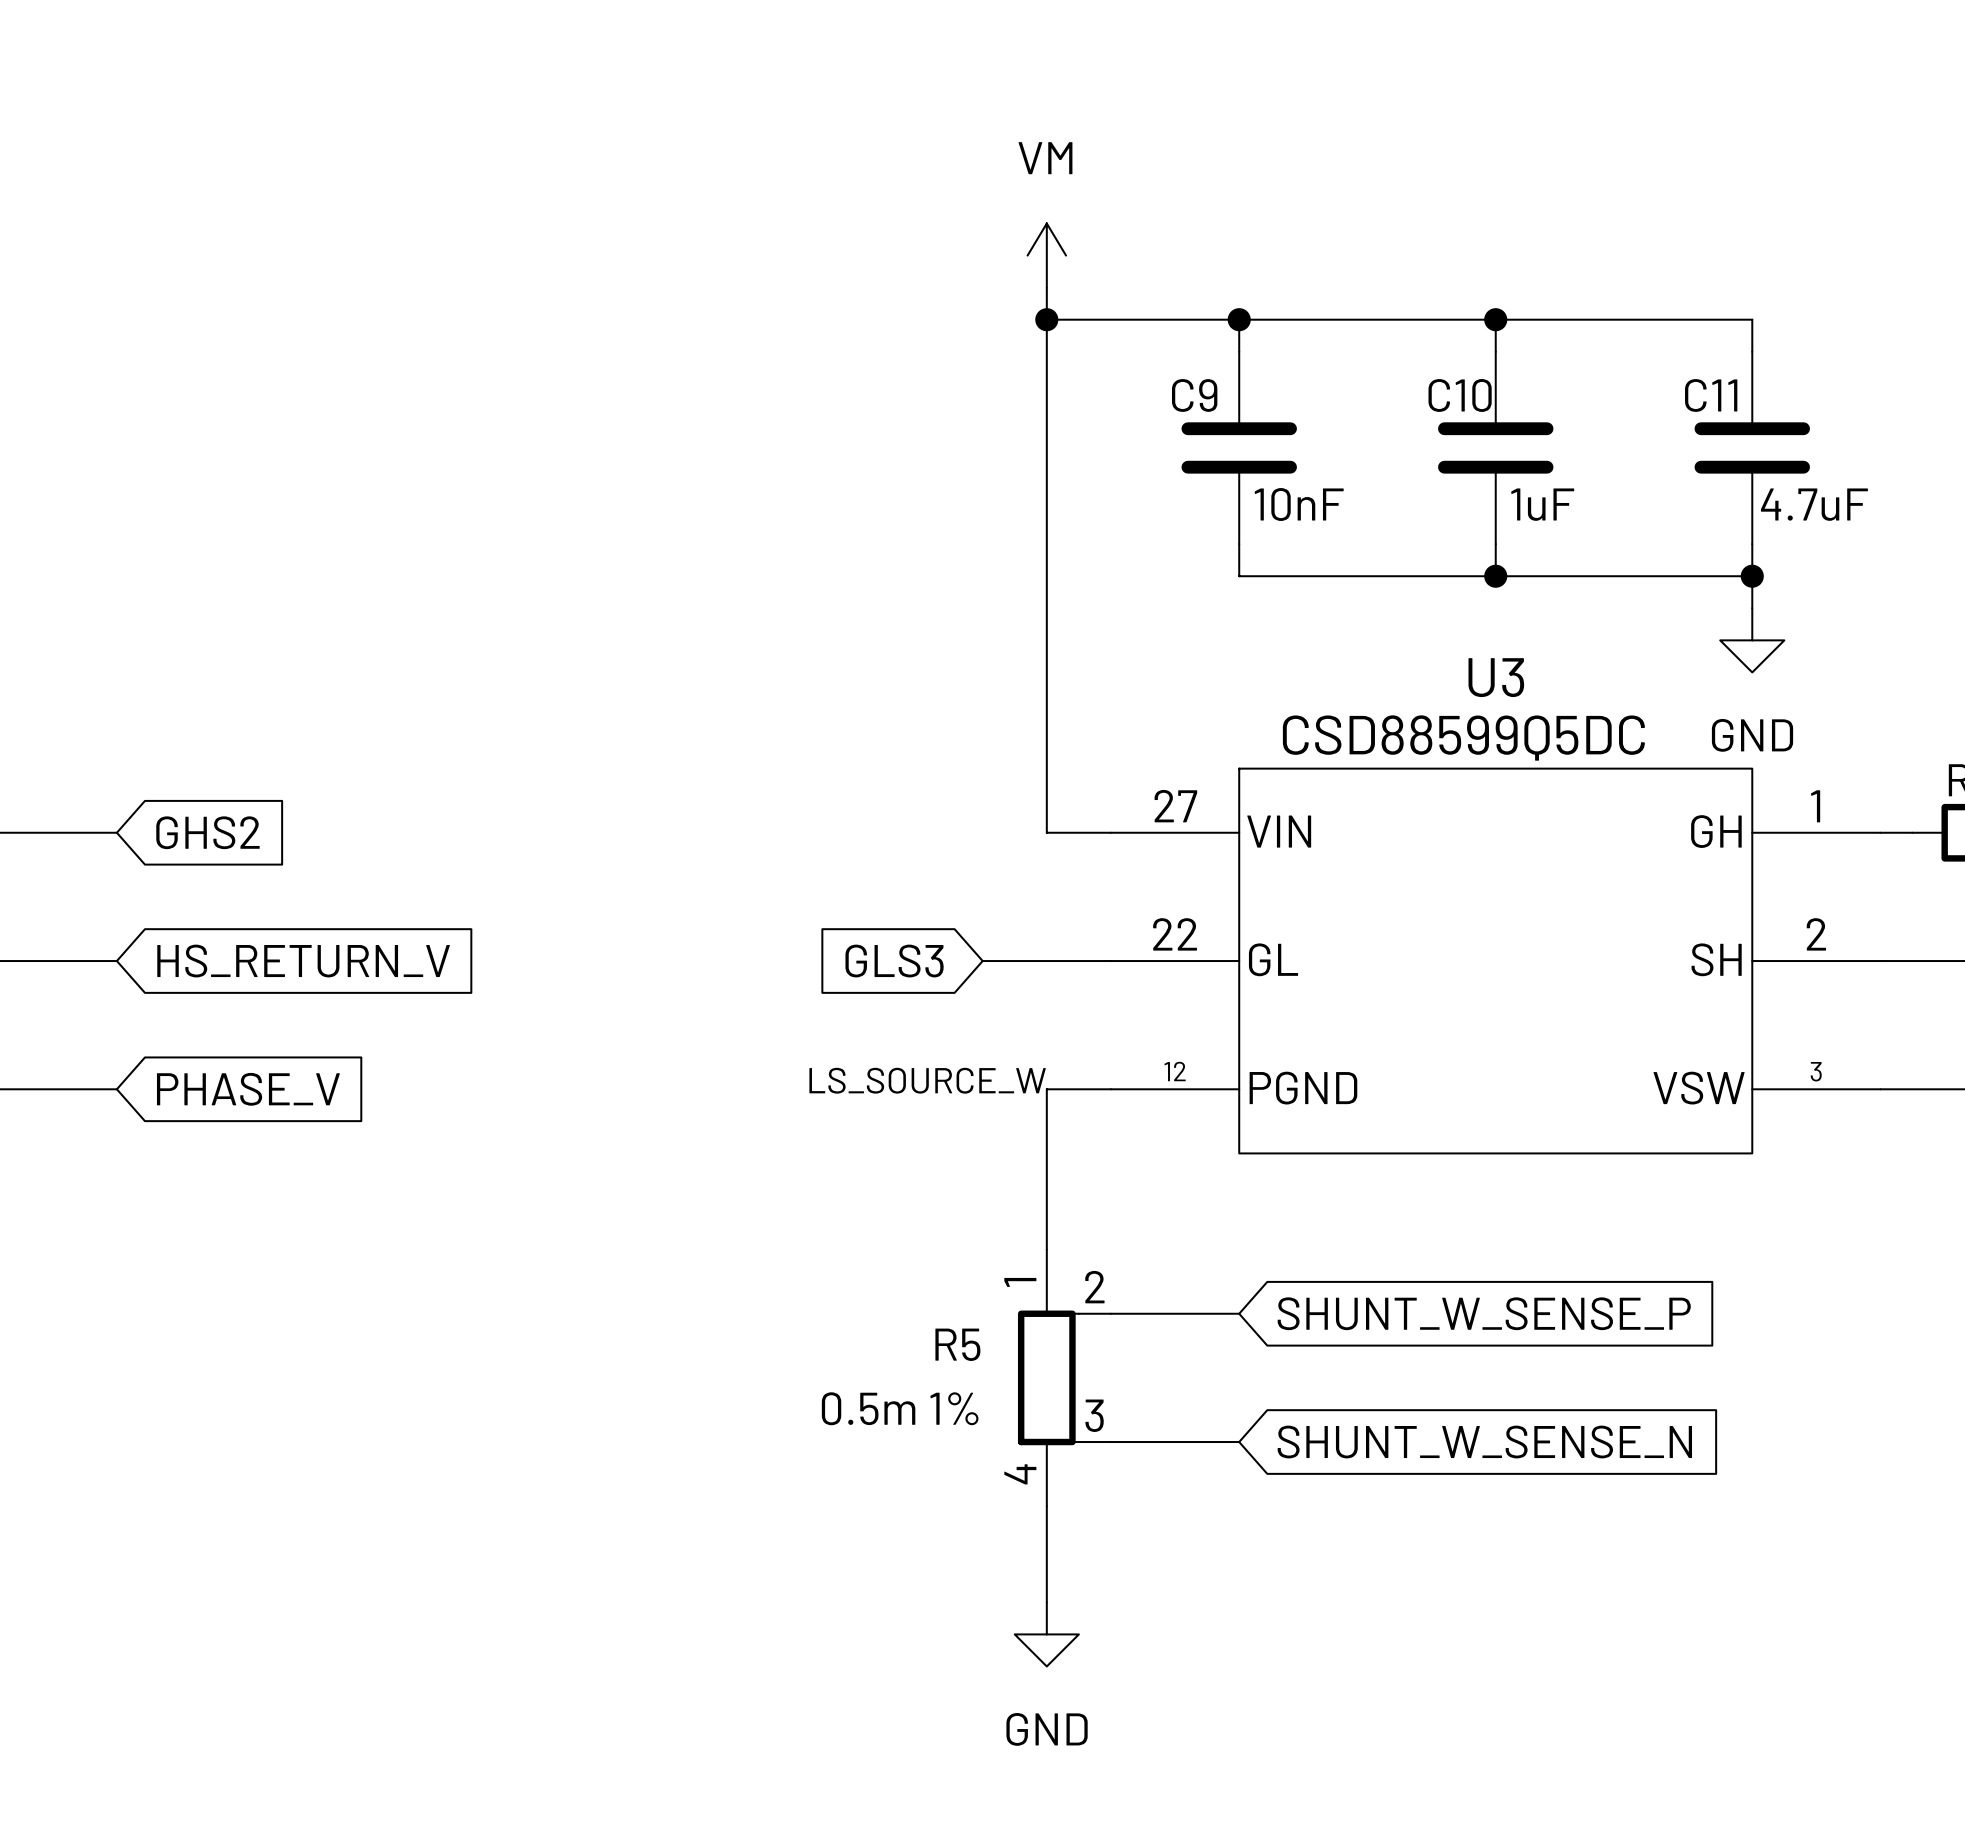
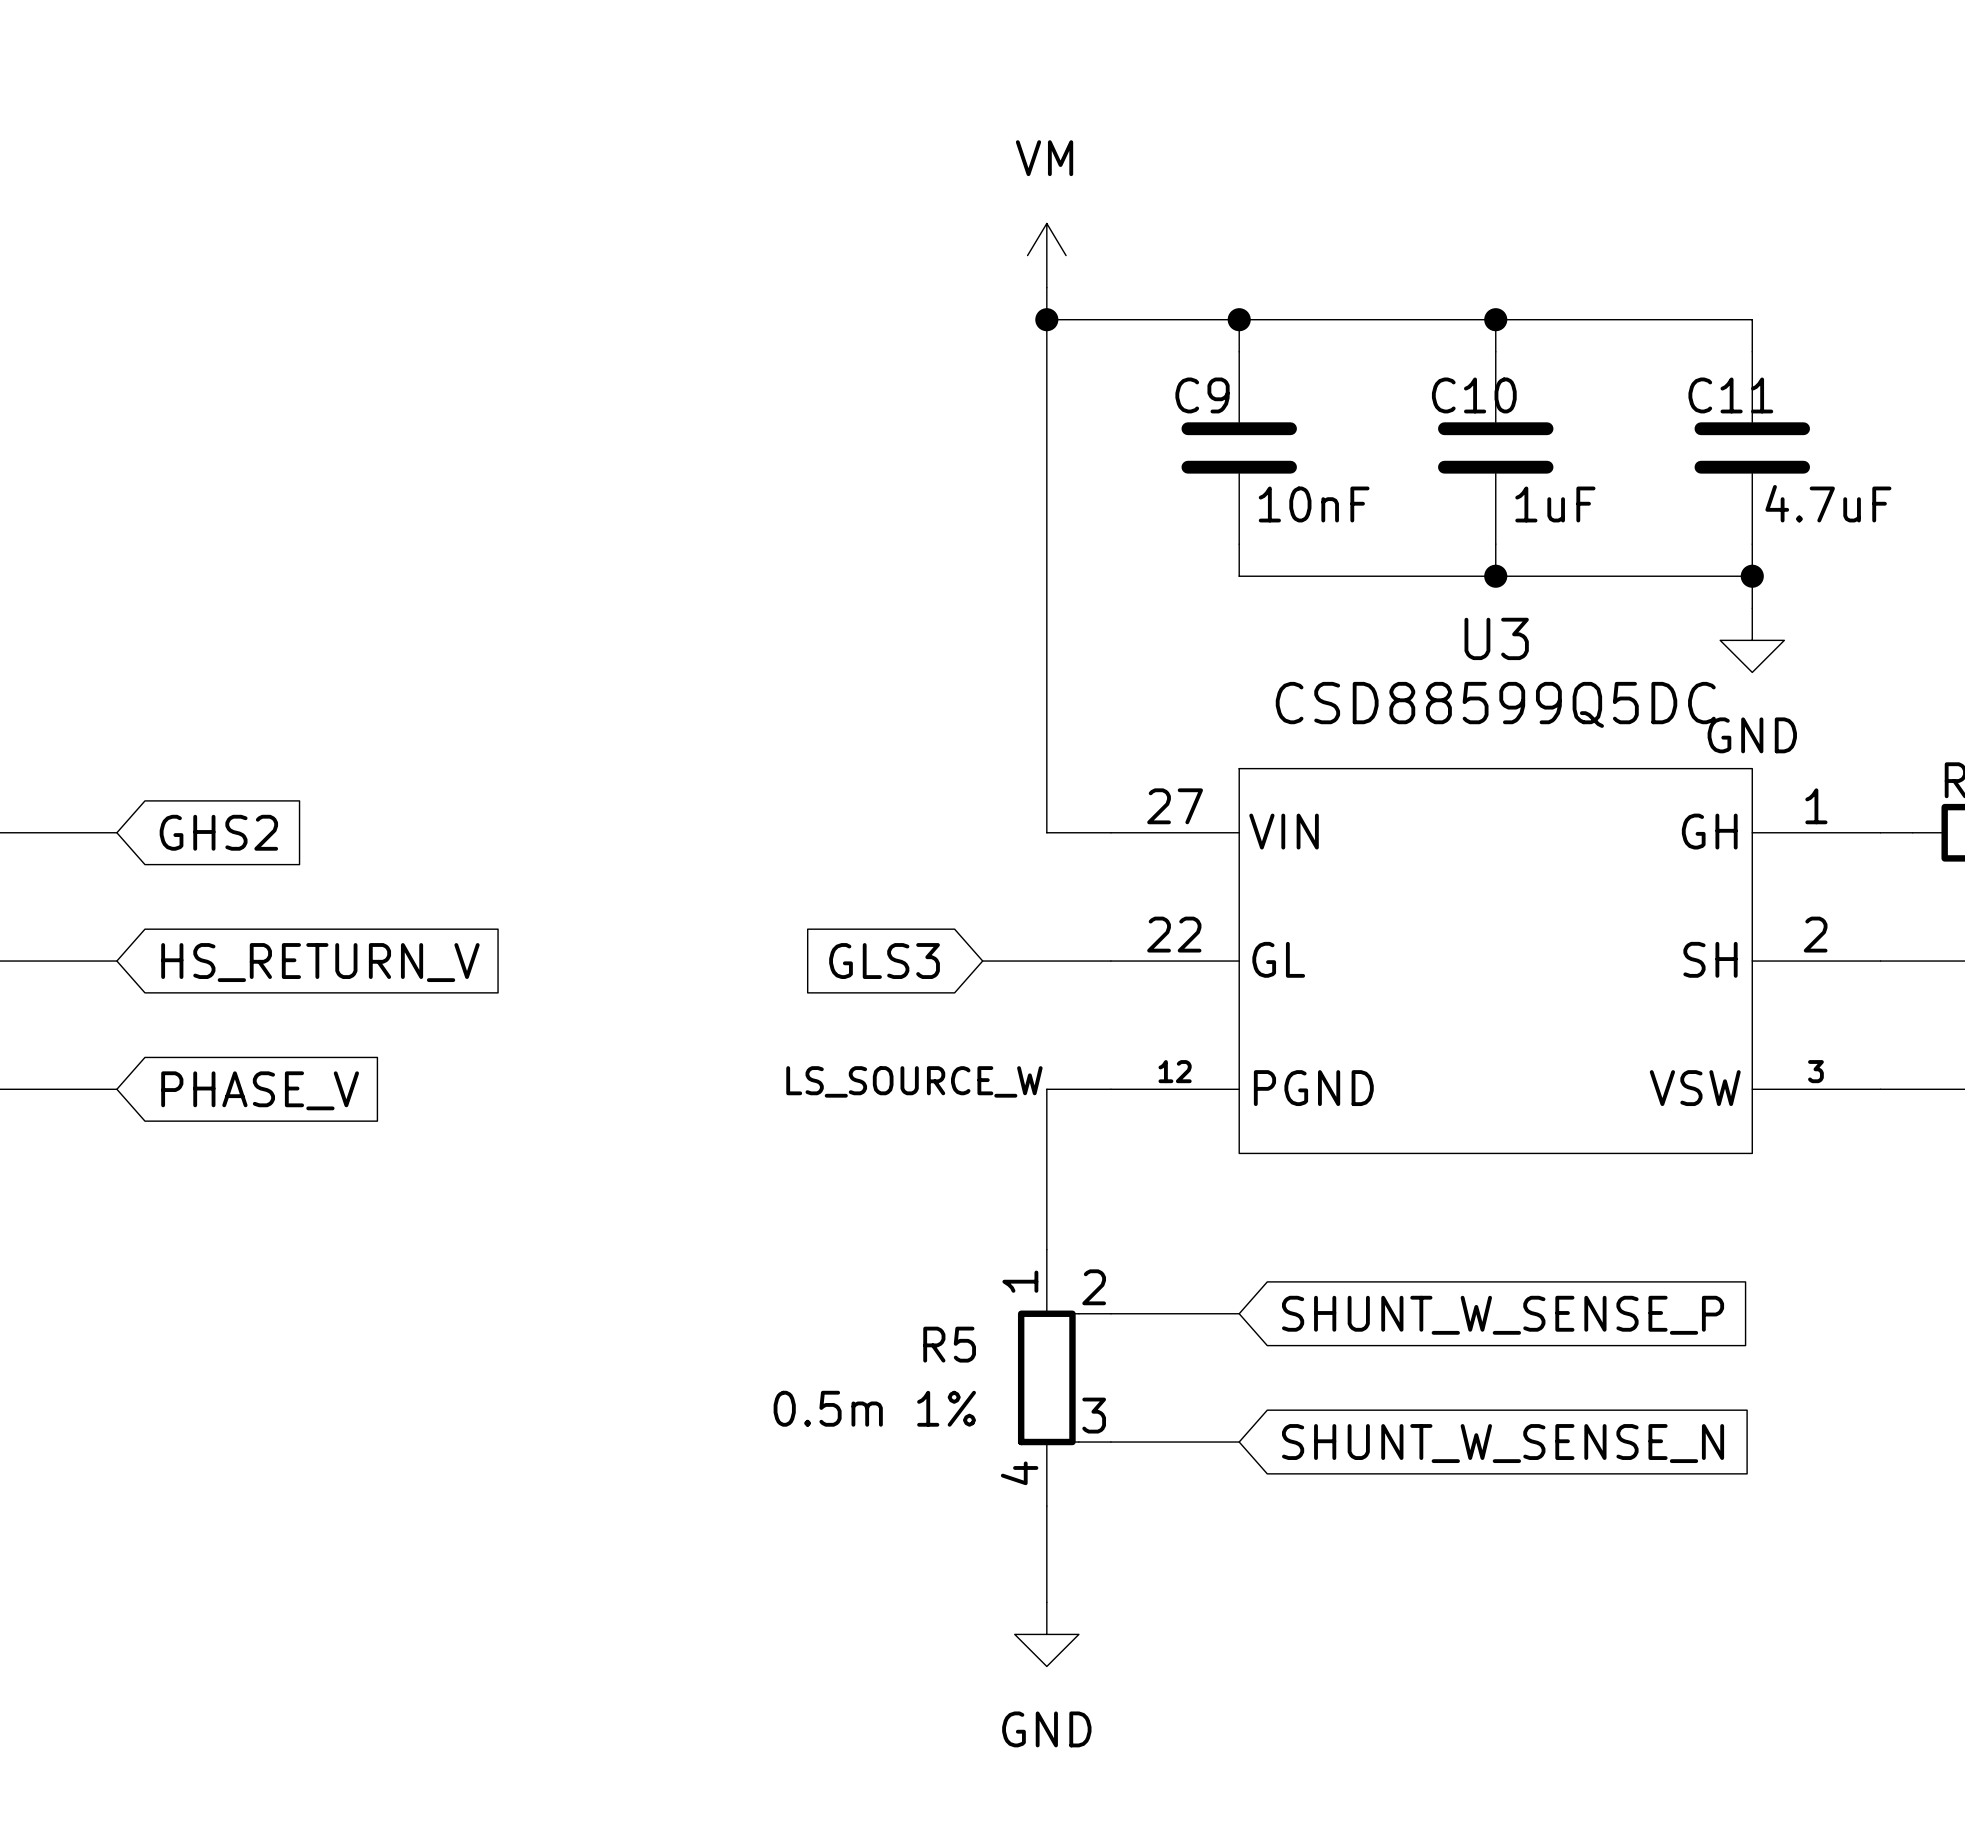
U3 name position: U3 (1496, 677) -> U3 (1496, 638)
U3 value position: CSD88599Q5DC (1463, 738) -> CSD88599Q5DC (1495, 704)

